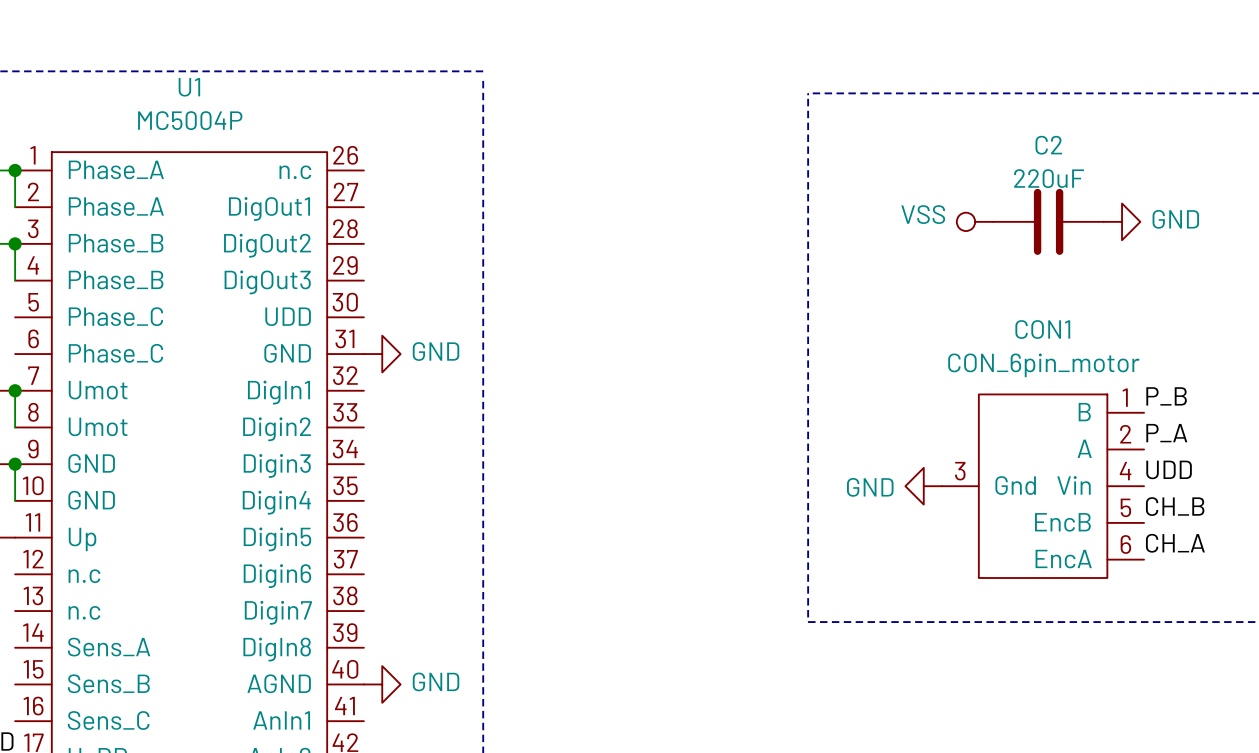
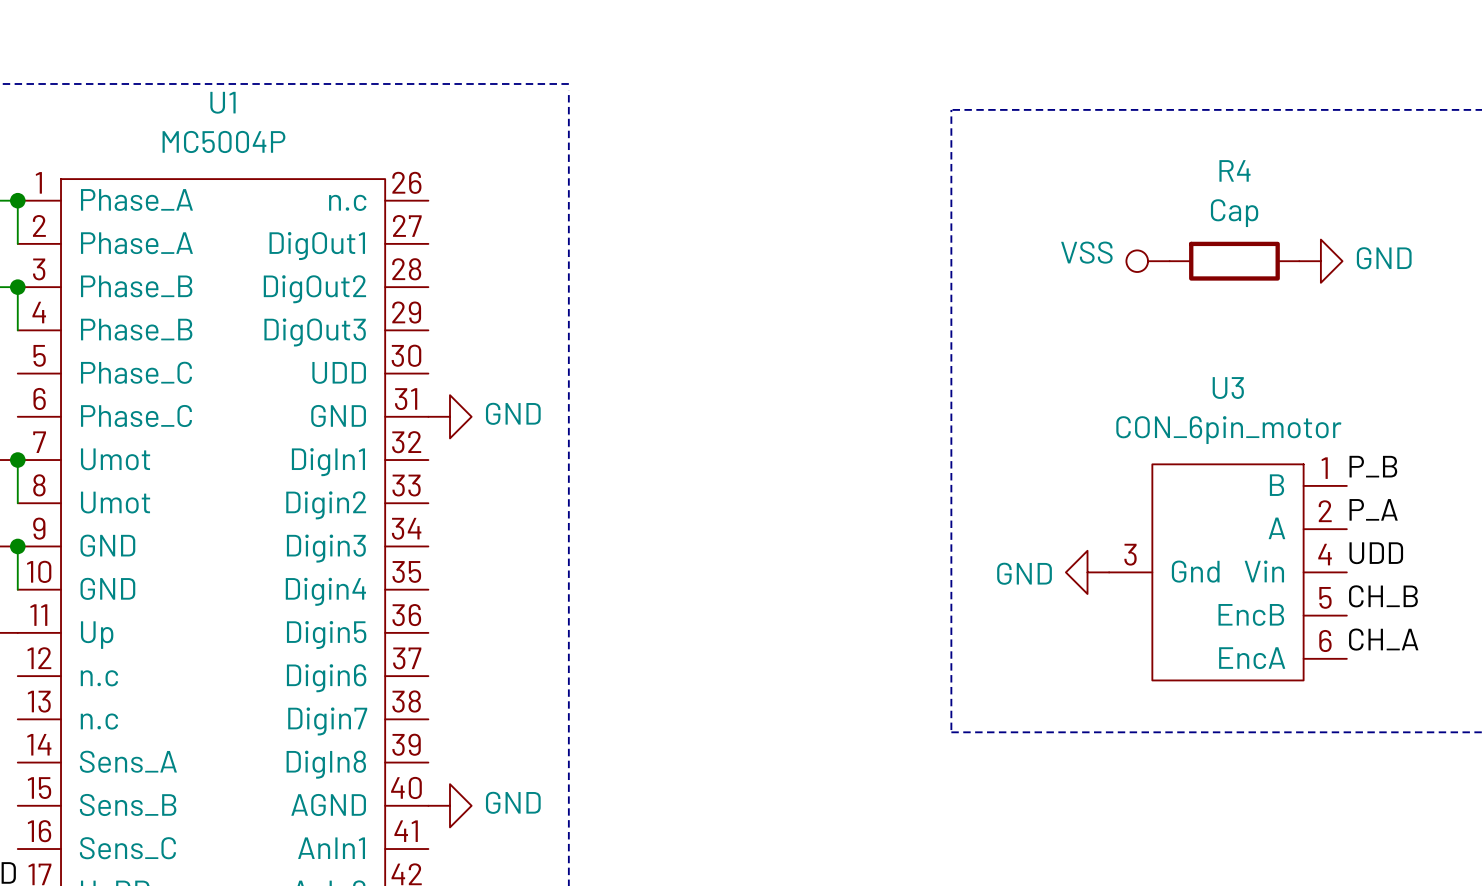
C2: 220uF (1048, 221) -> none
R4: none -> Cap (1234, 261)
CON1 name: CON1 (1042, 329) -> U3 (1228, 388)

